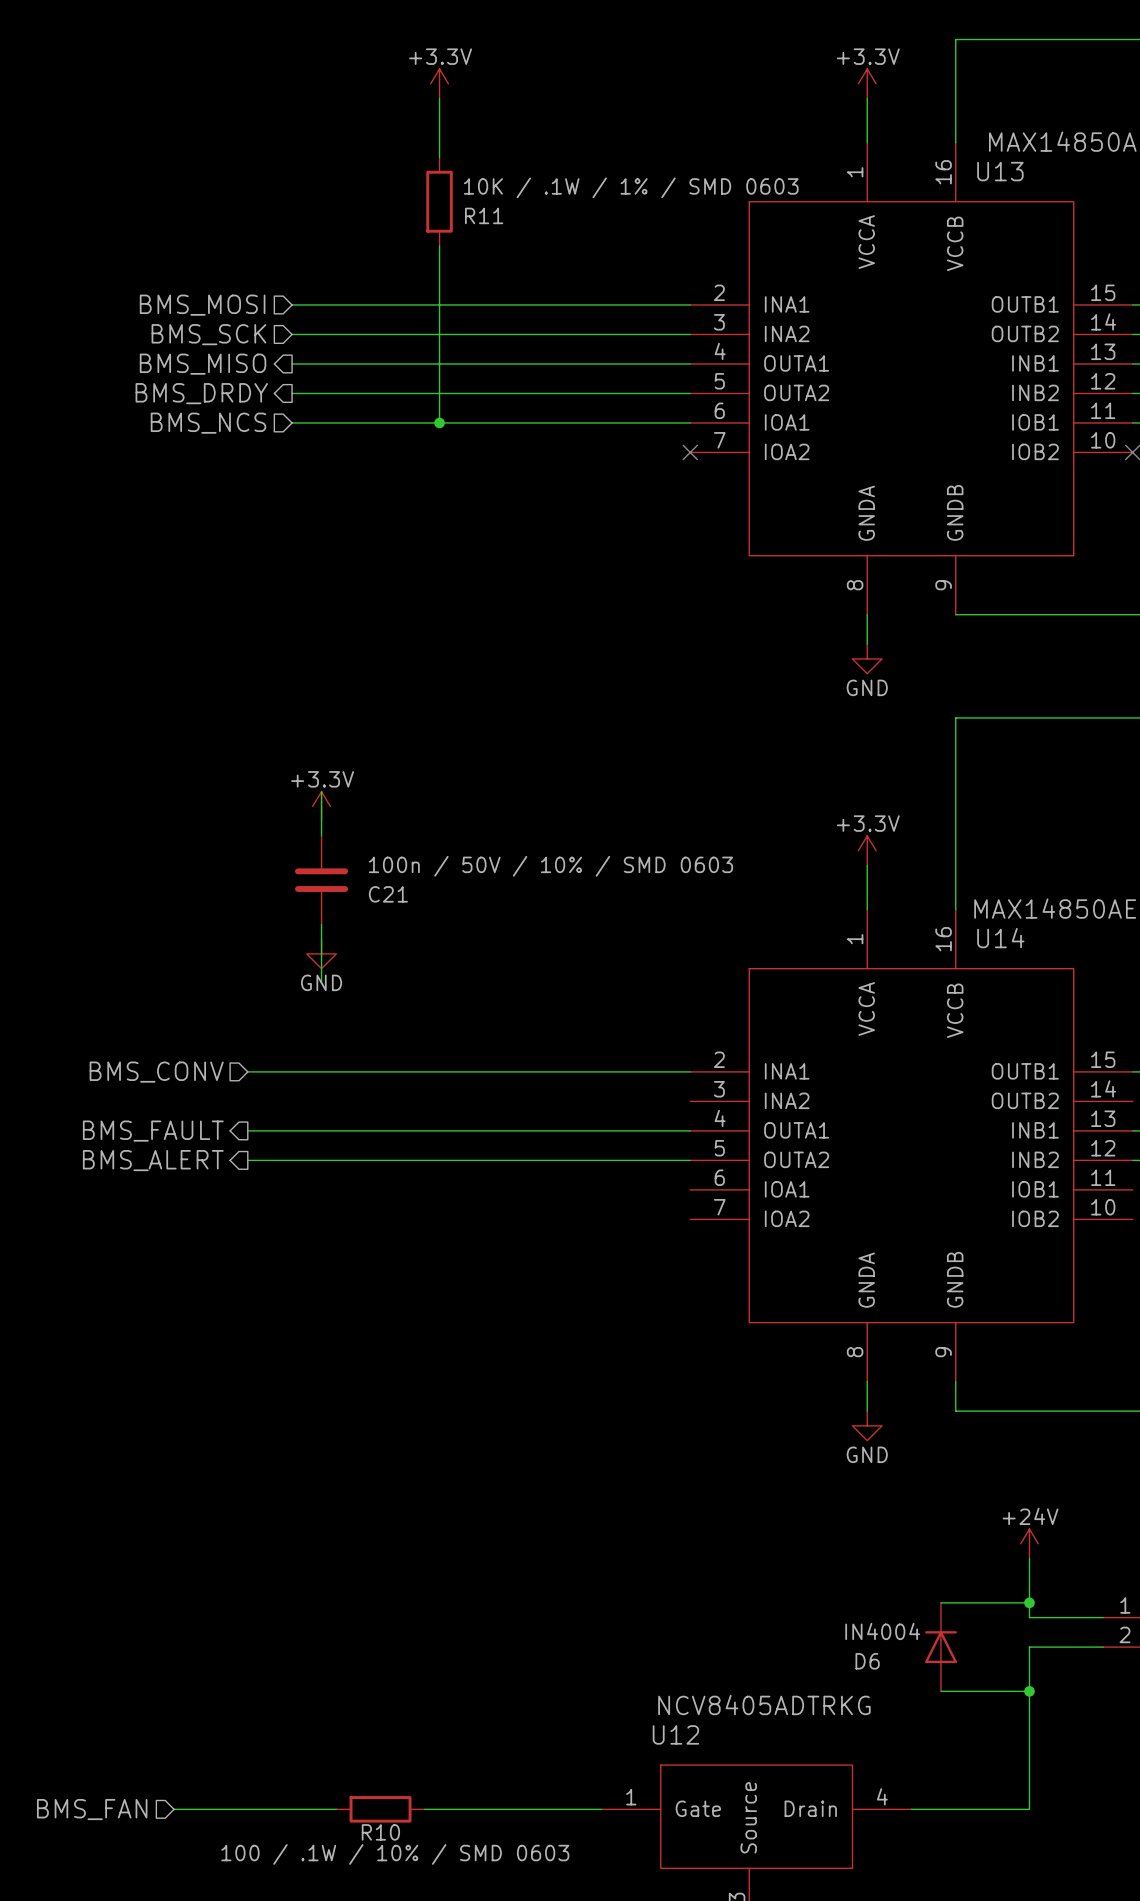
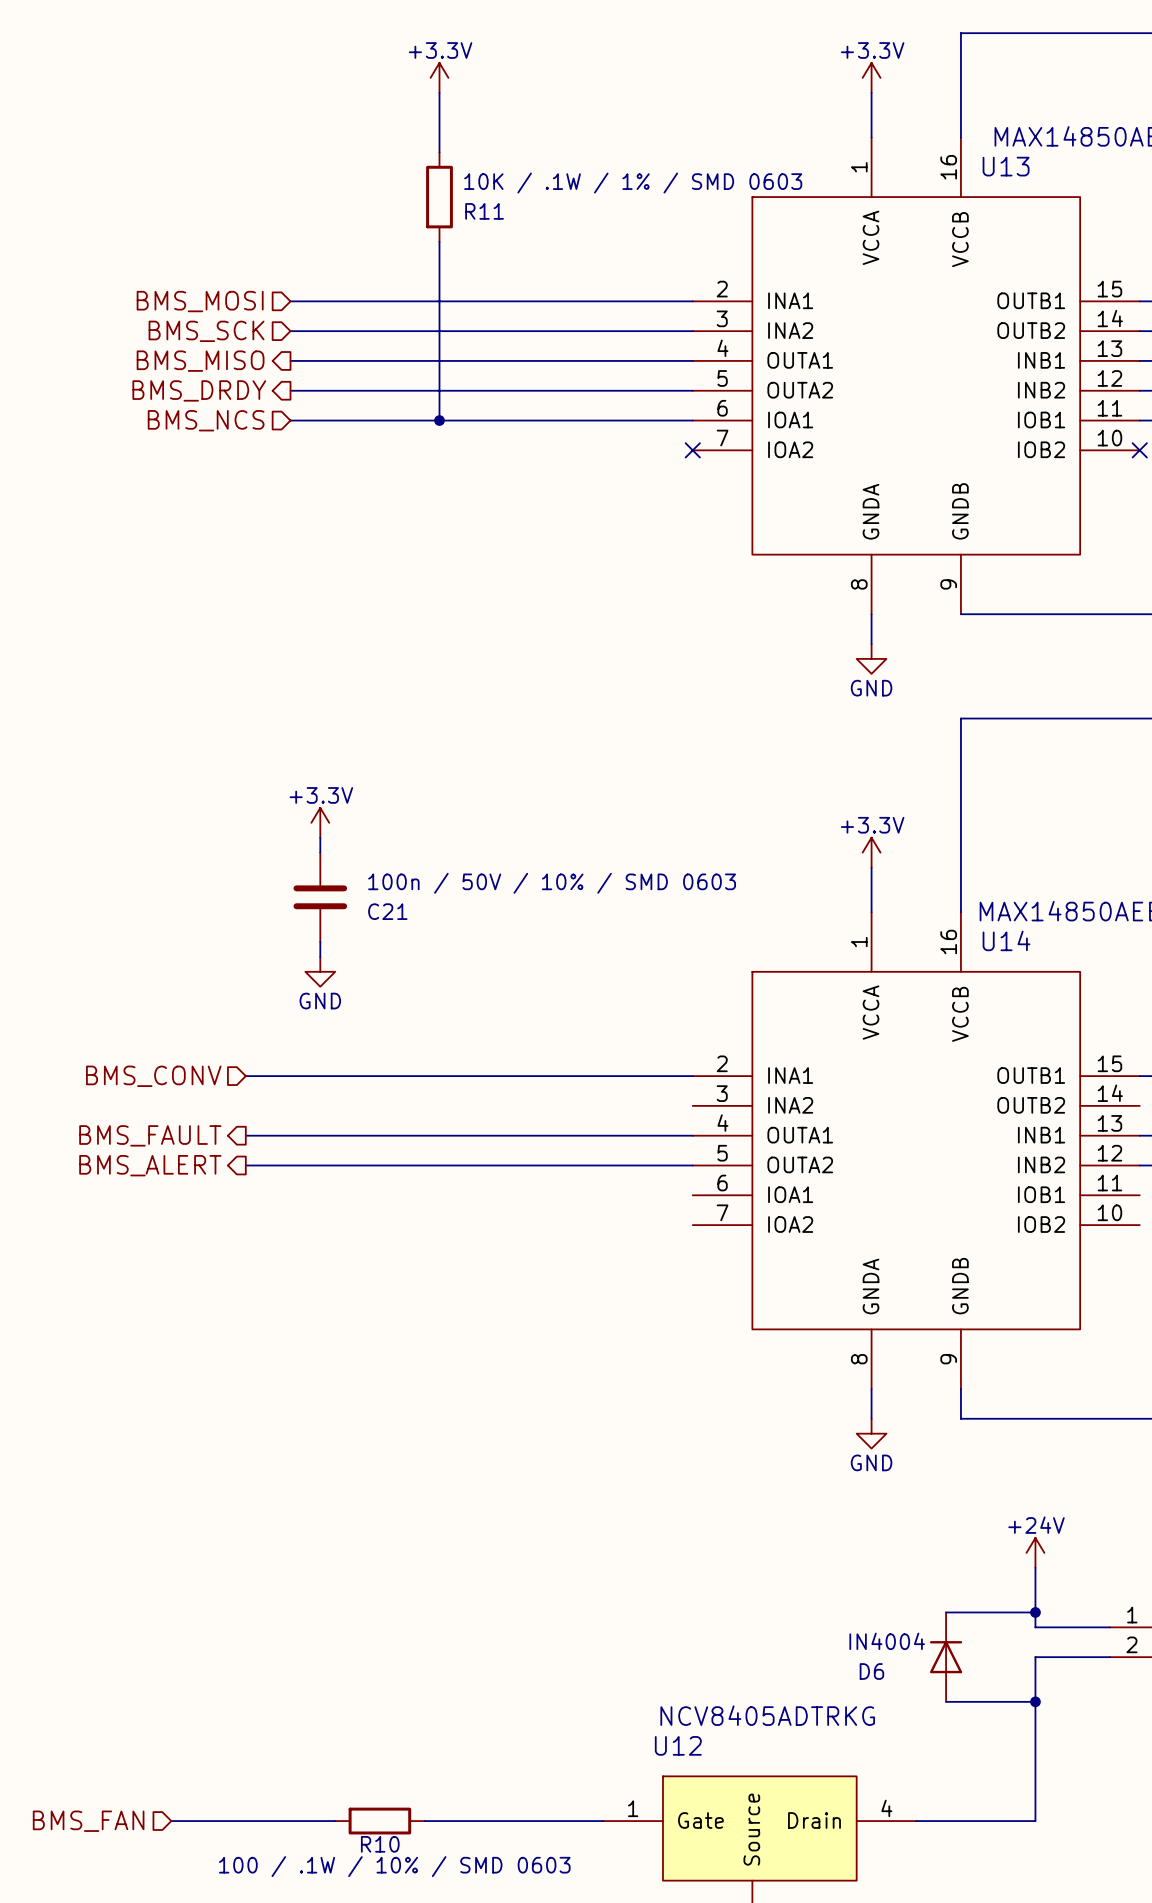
power symbol position: +3.3V (321, 806) -> +3.3V (320, 822)
C21 position: (321, 880) -> (320, 897)
power symbol position: GND (321, 953) -> GND (320, 971)

